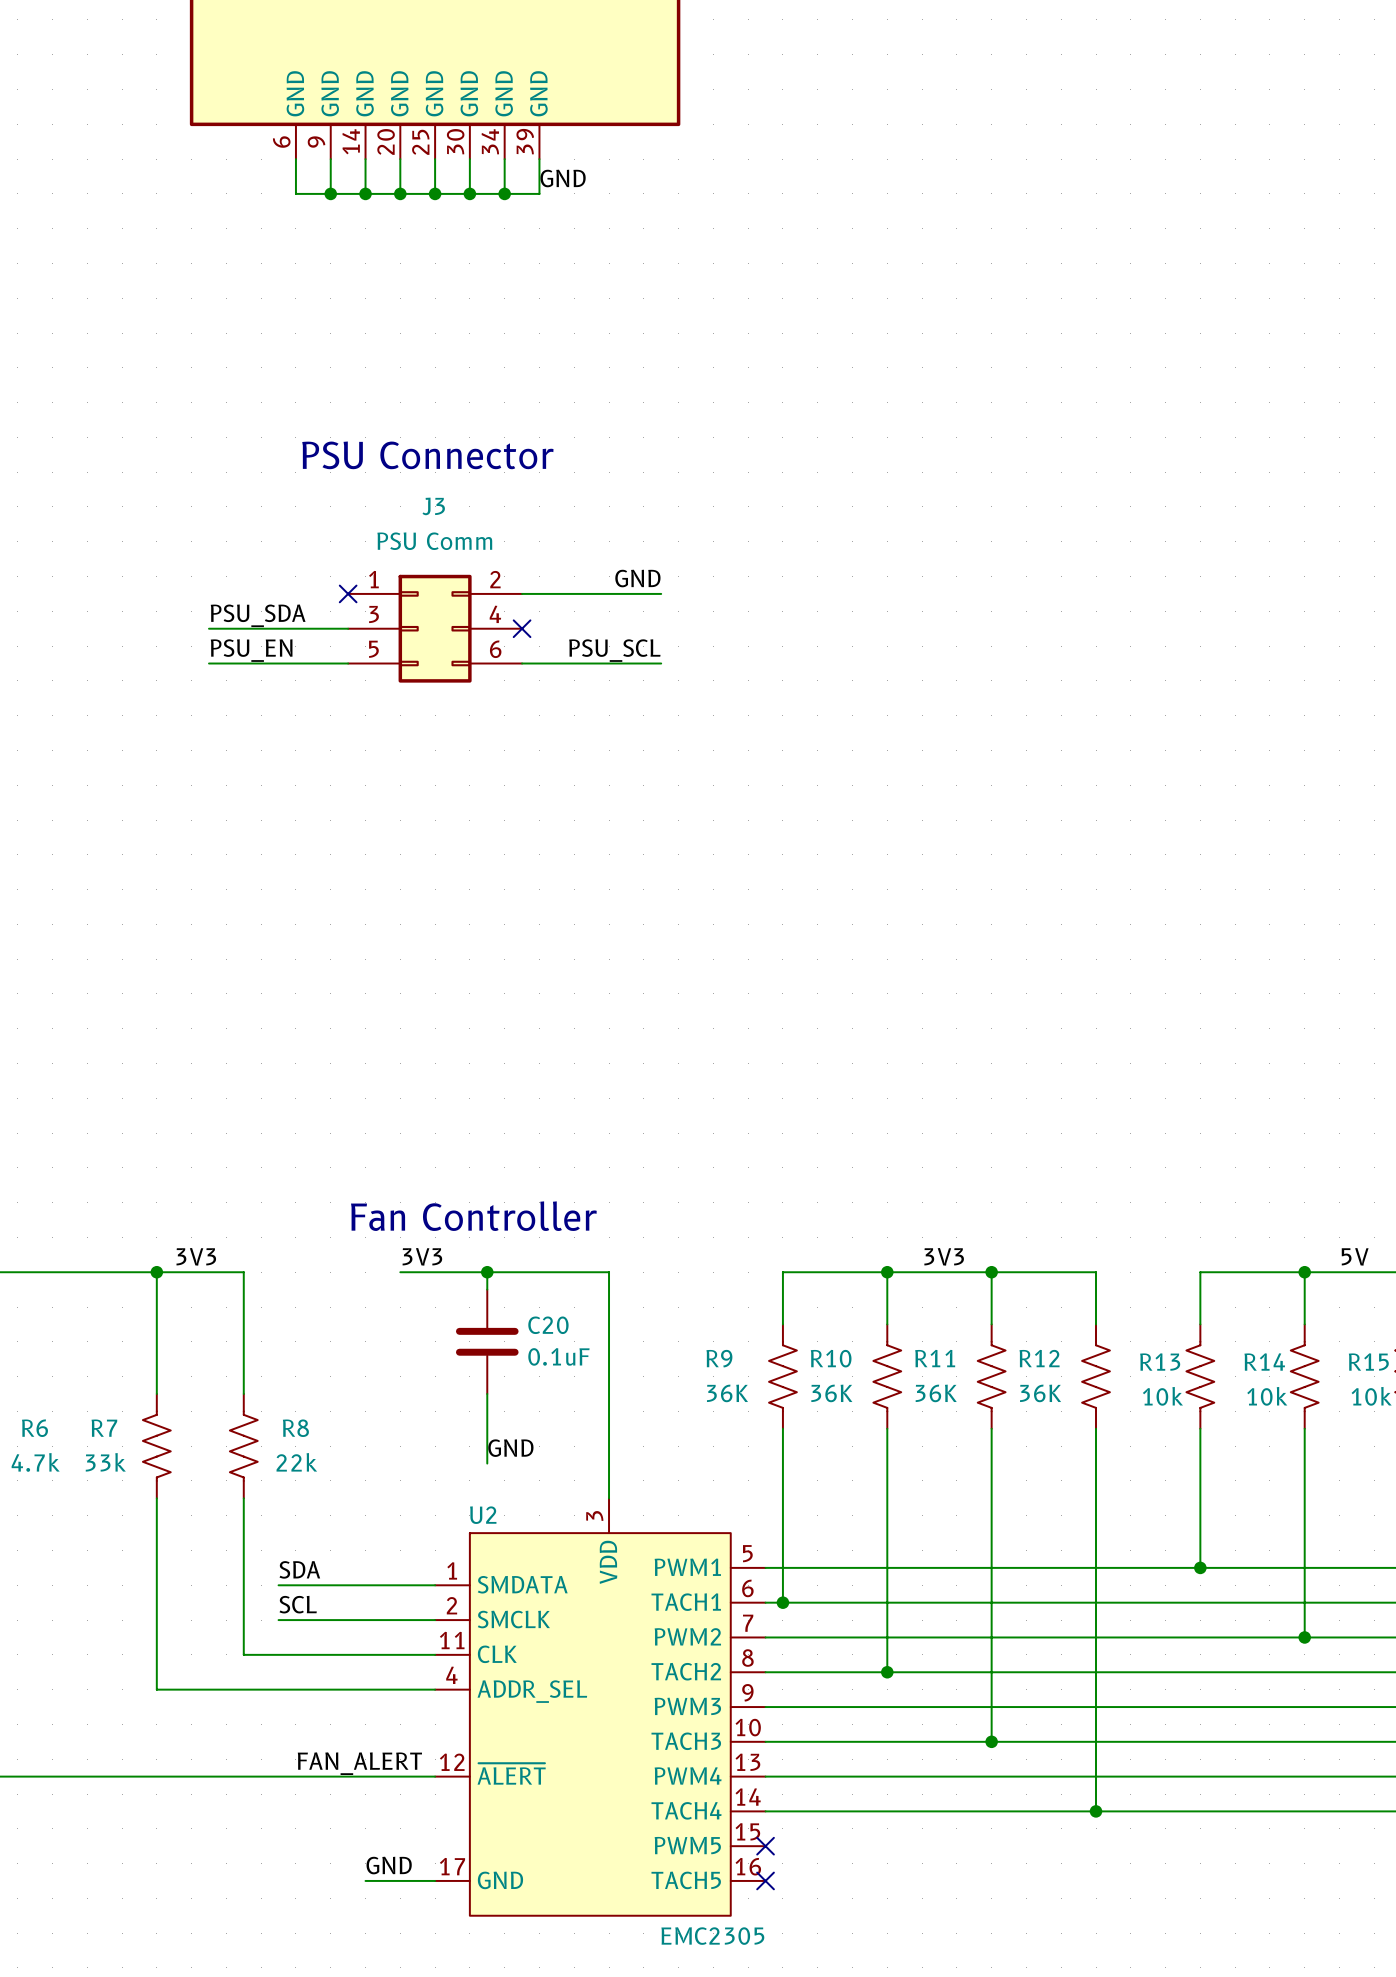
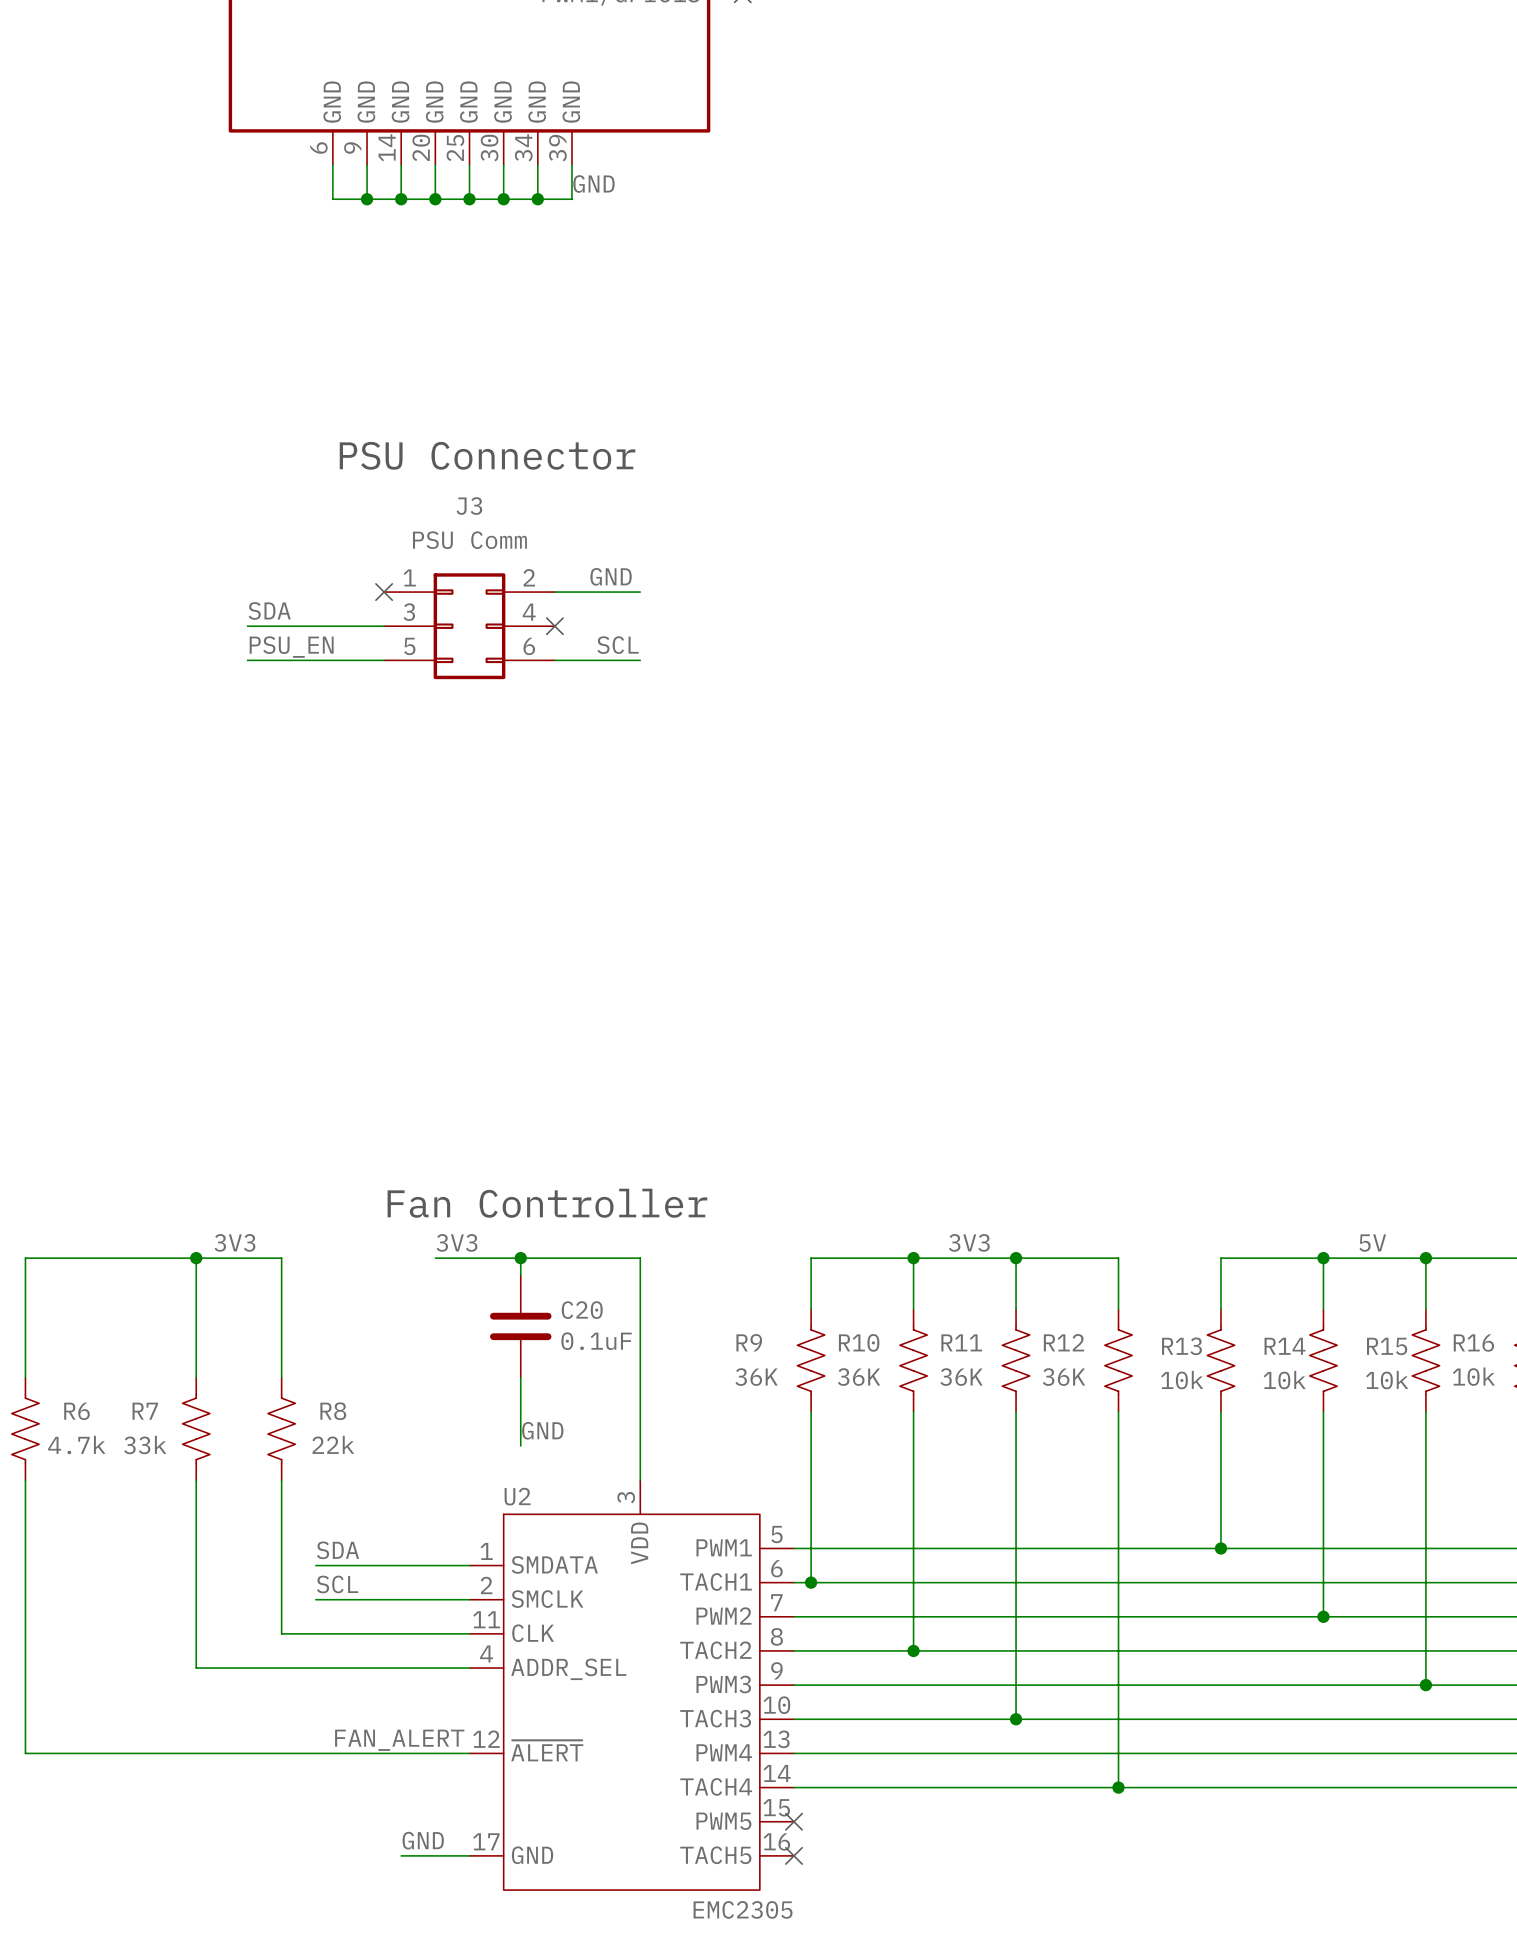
label position: GND (637, 578) -> GND (611, 576)
wire: (609, 593) (661, 593) -> none
label: PSU_SDA (258, 615) -> SDA (269, 610)
label: none -> SCL (618, 645)
label: PSU_SCL (614, 650) -> none
wire: (609, 663) (661, 663) -> none

